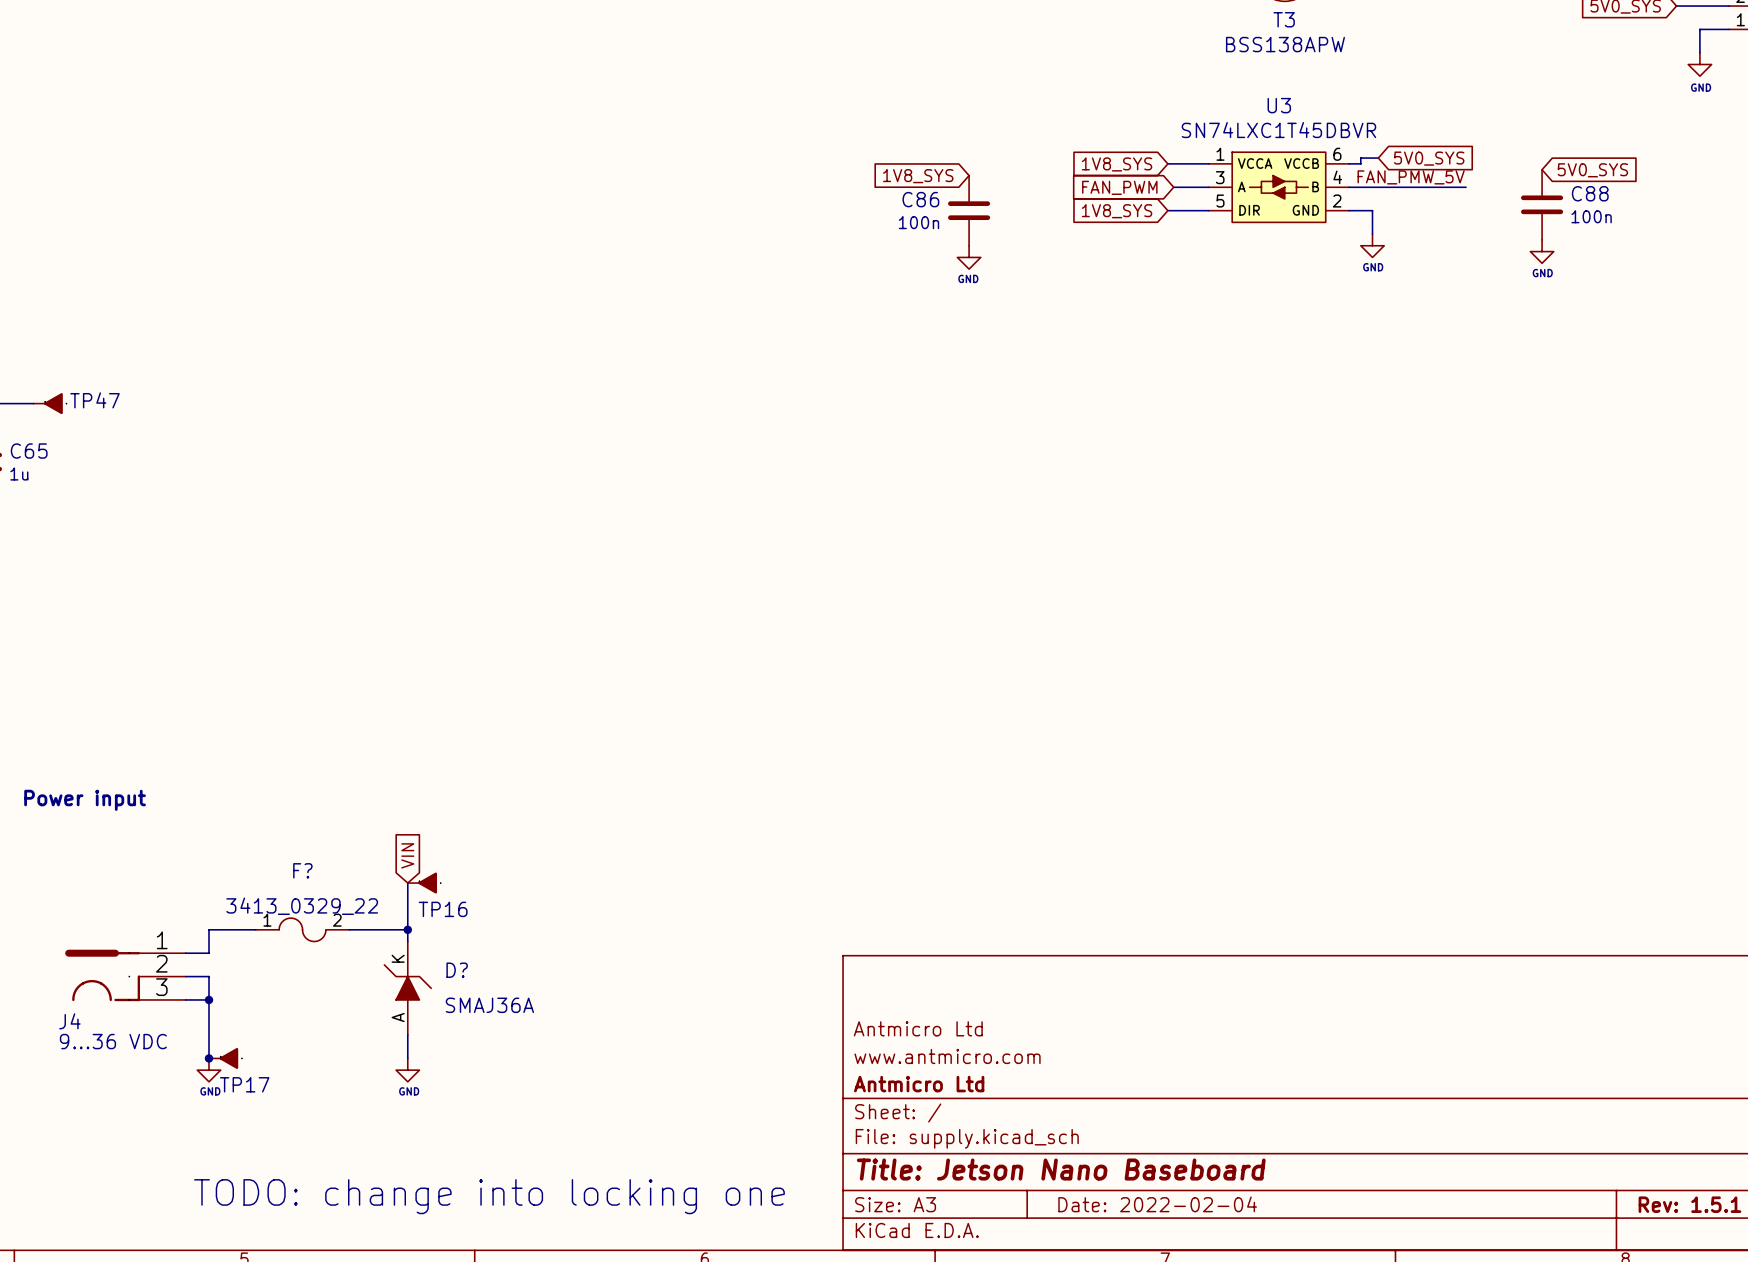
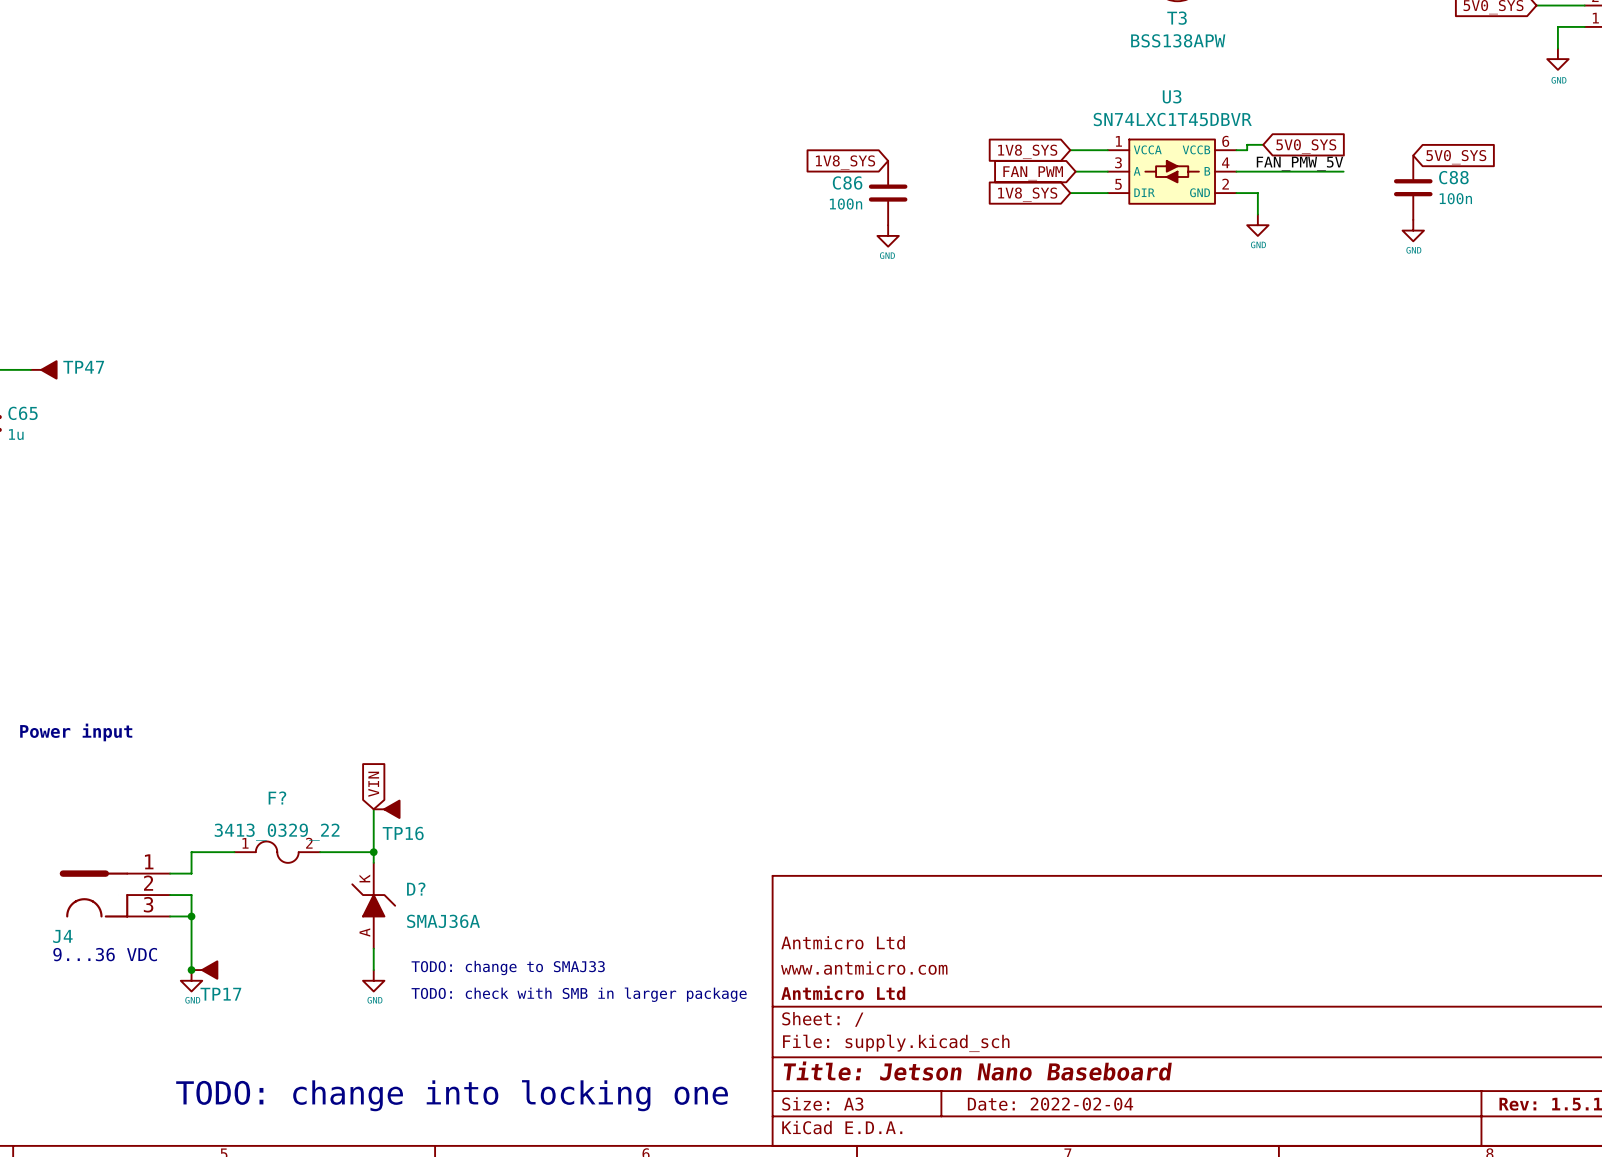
text: none -> TODO: change to SMAJ33 (508, 967)
text: none -> TODO: check with SMB in larger package (579, 994)

